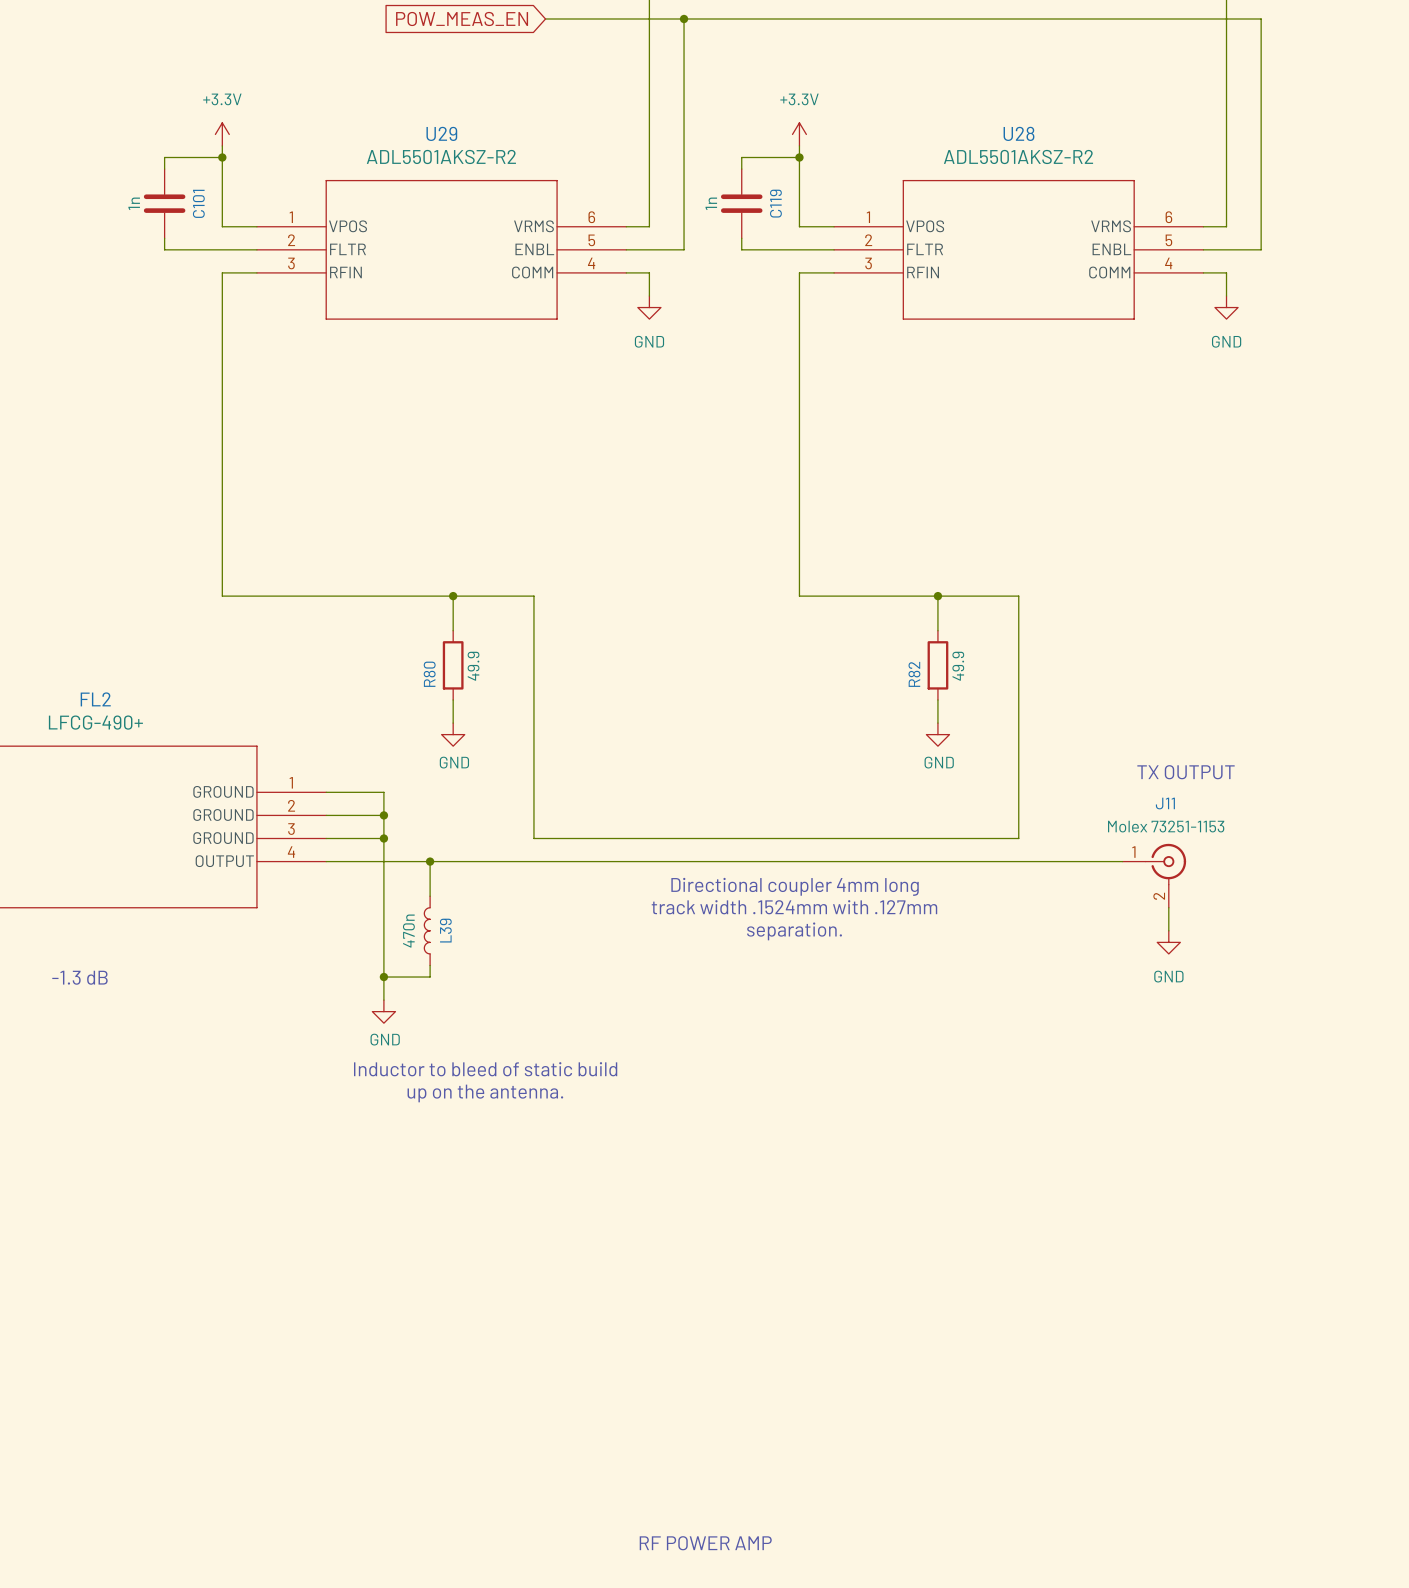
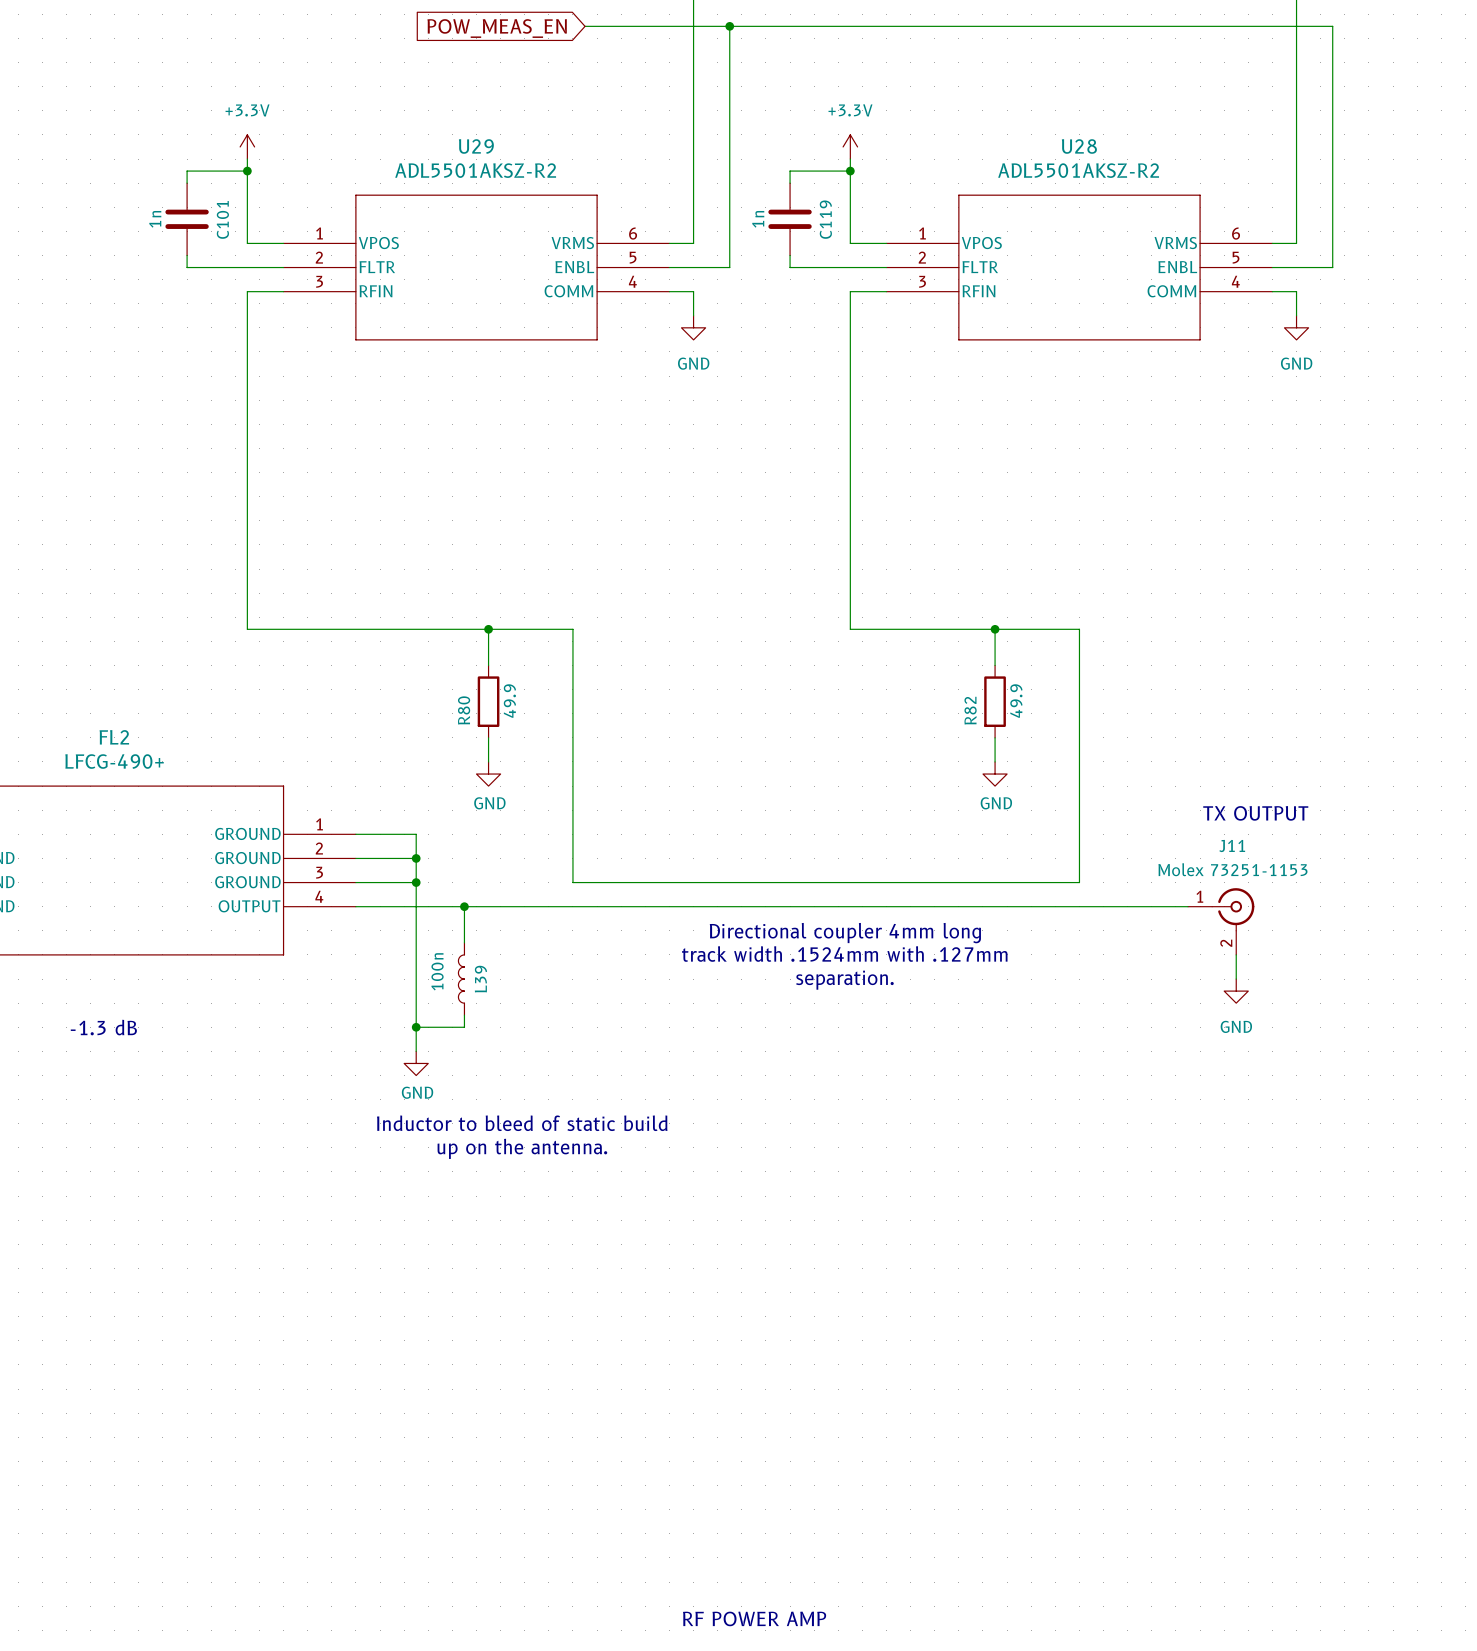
L39 value: 470n (408, 931) -> 100n (437, 971)

